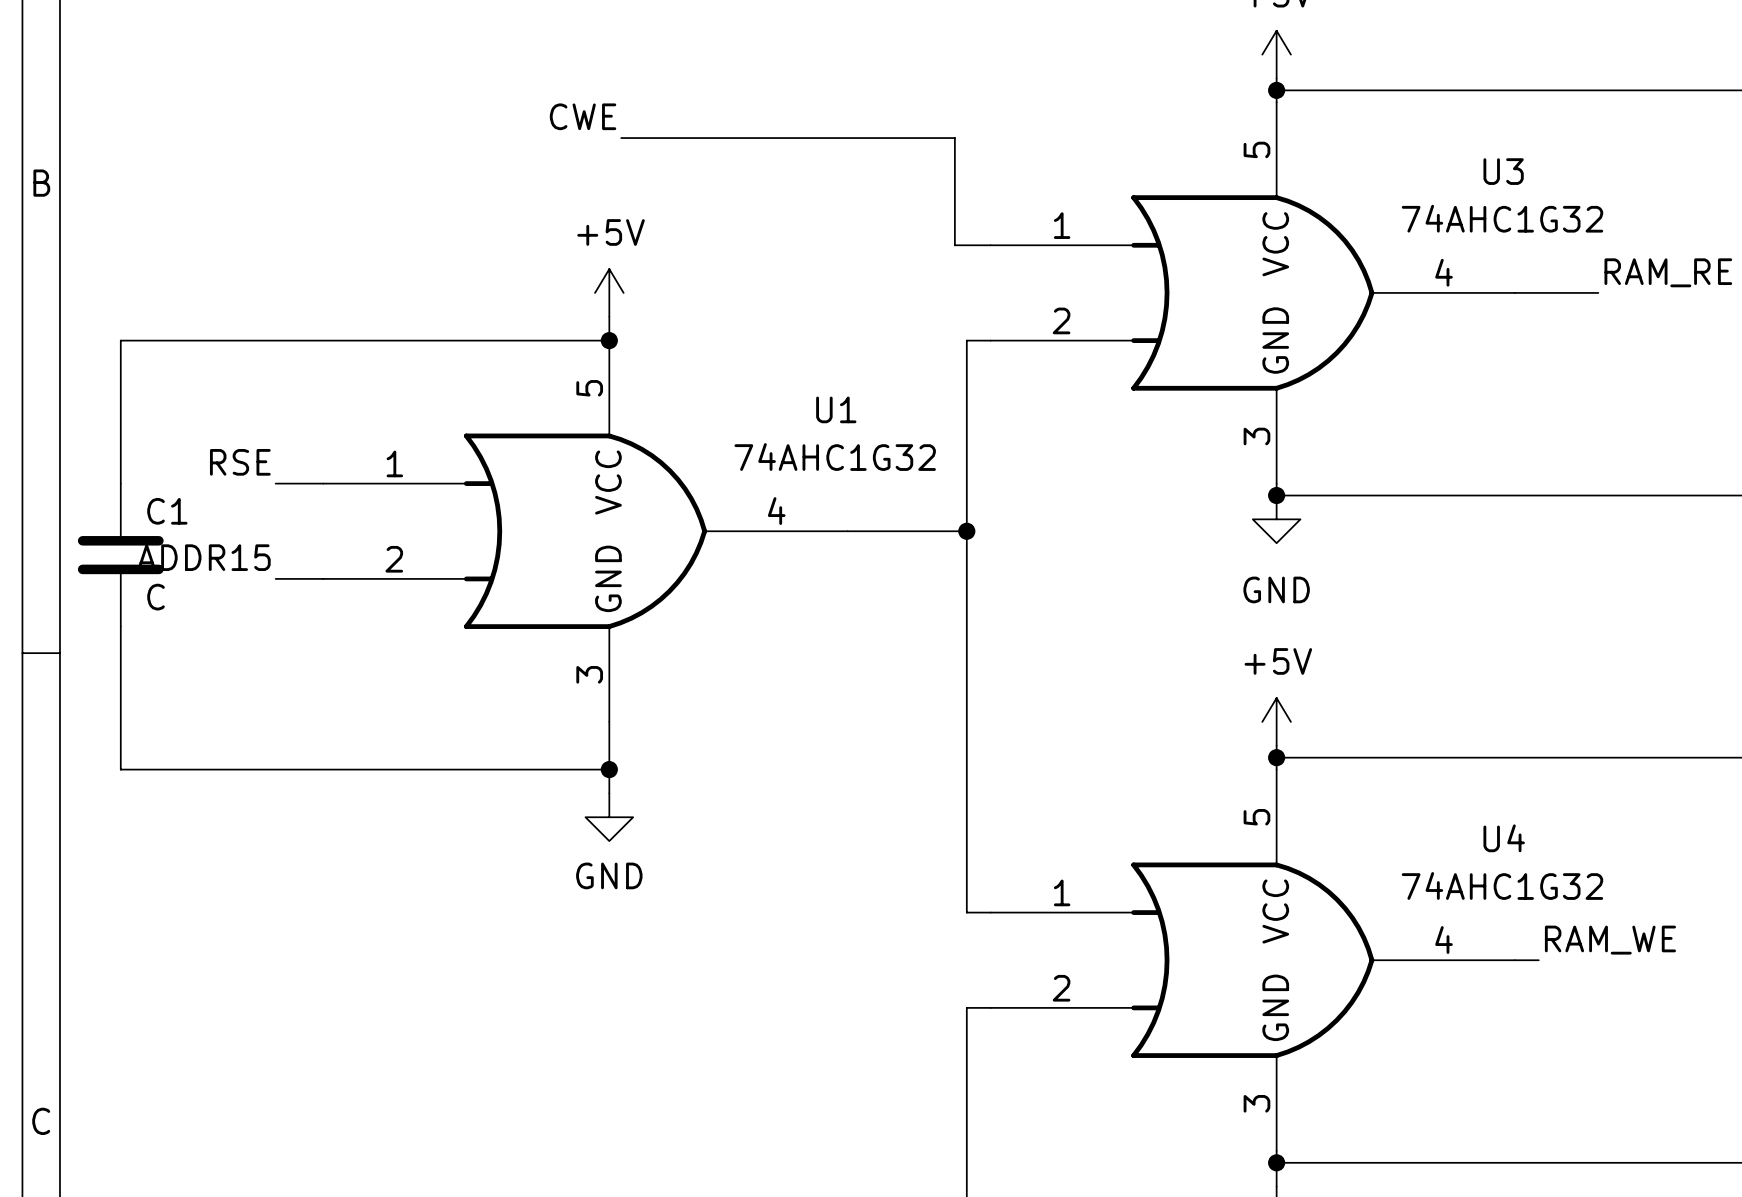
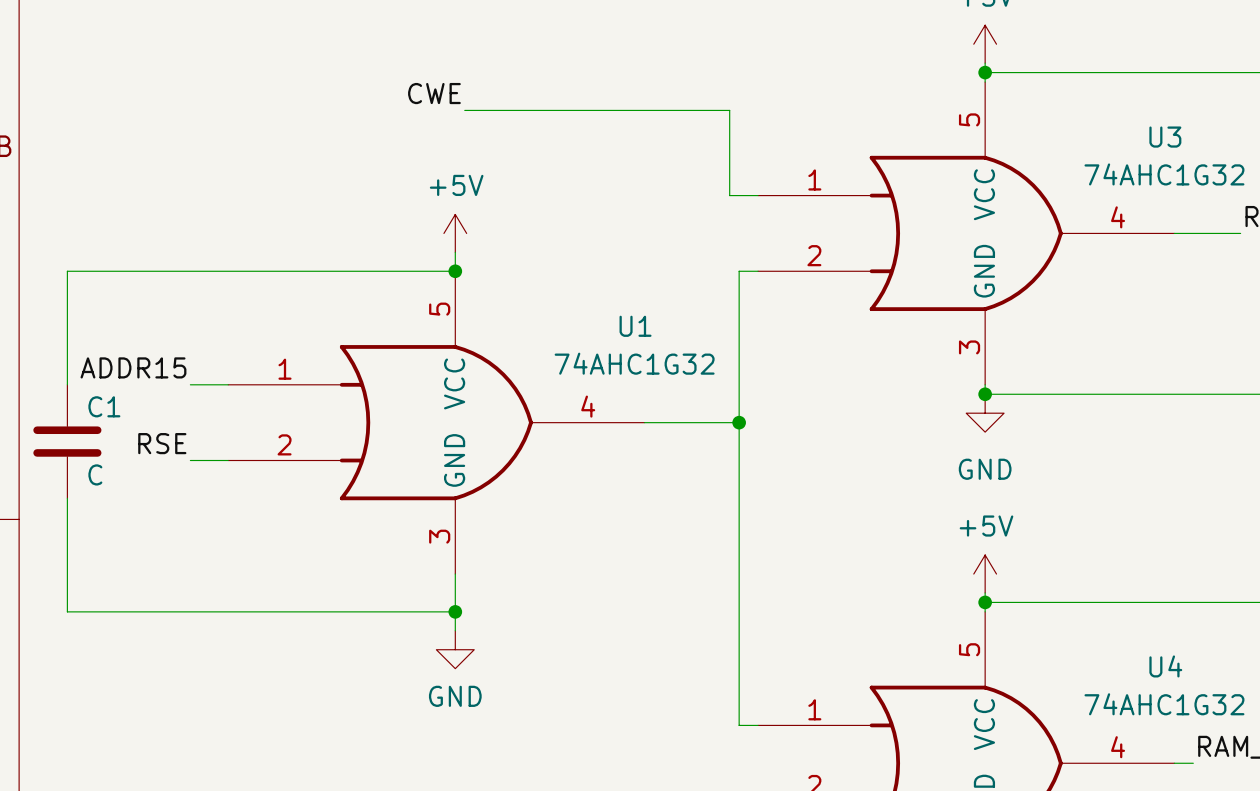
label: RSE (240, 462) -> ADDR15 (133, 367)
label: ADDR15 (204, 557) -> RSE (162, 443)

